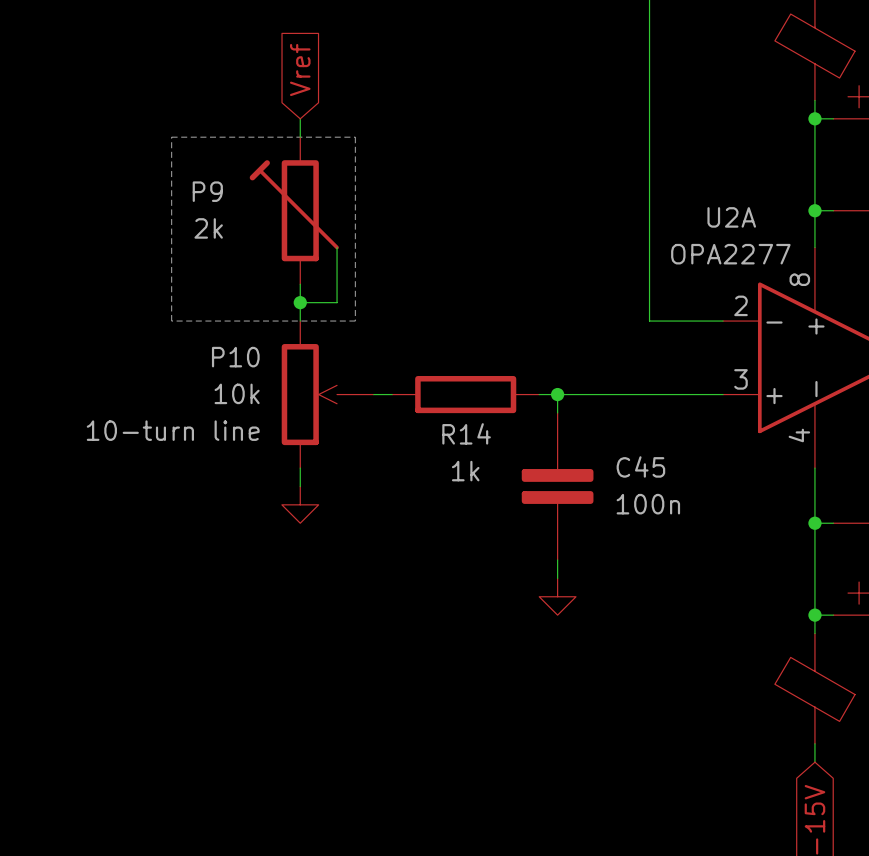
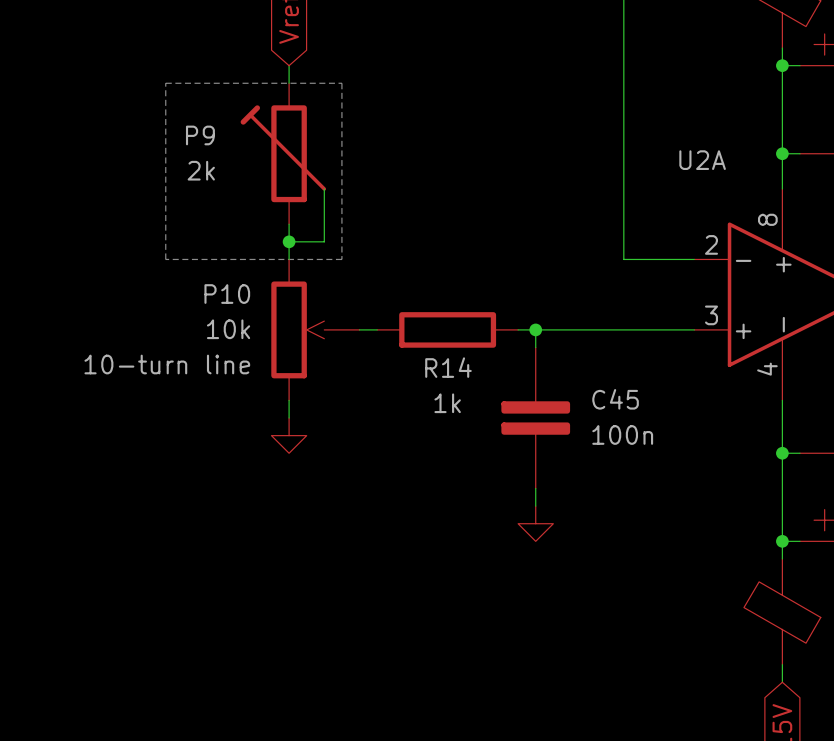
U2A value: OPA2277 (730, 254) -> none

